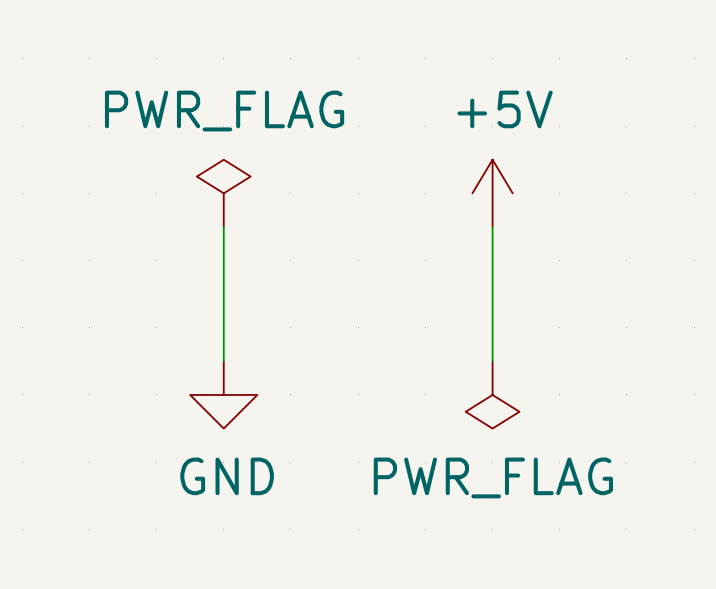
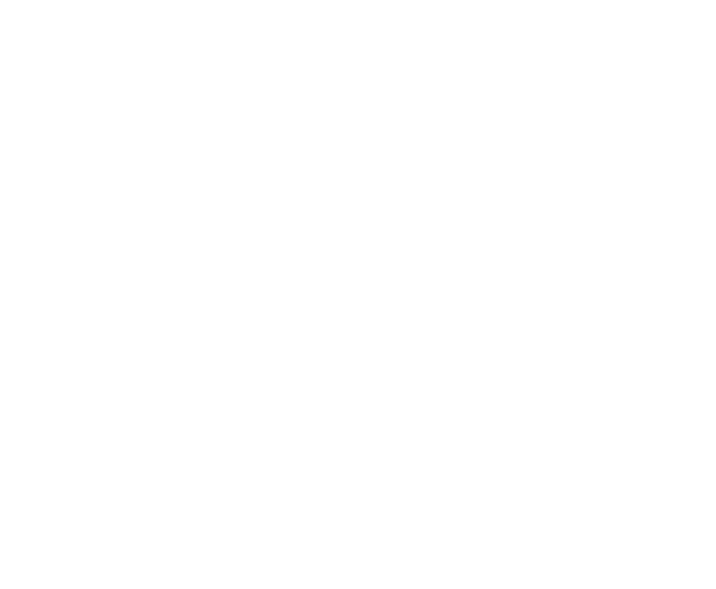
power symbol: PWR_FLAG (223, 193) -> none
power symbol: +5V (492, 193) -> none
wire: (223, 226) (223, 361) -> none
wire: (492, 226) (492, 361) -> none
power symbol: GND (223, 394) -> none
power symbol: PWR_FLAG (492, 394) -> none

